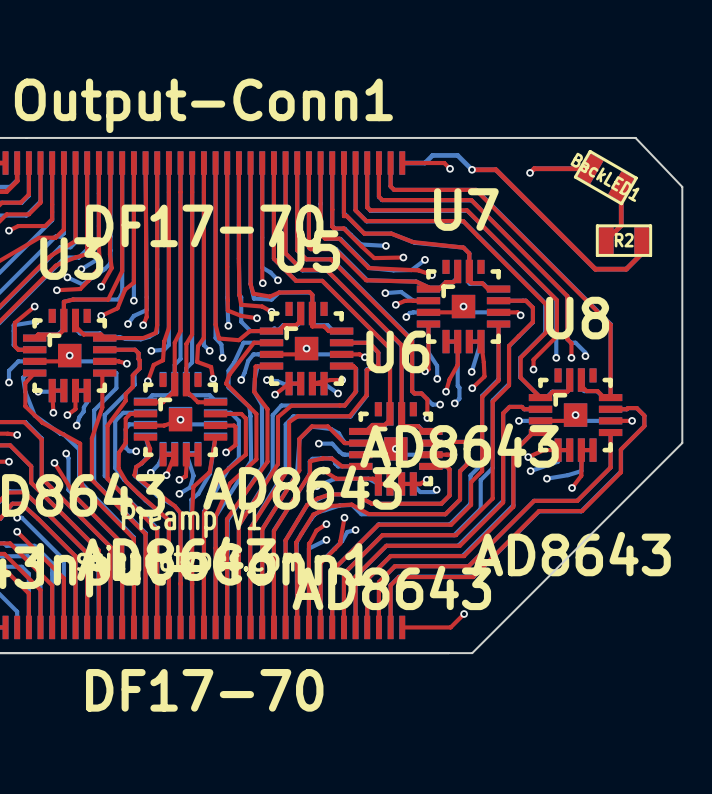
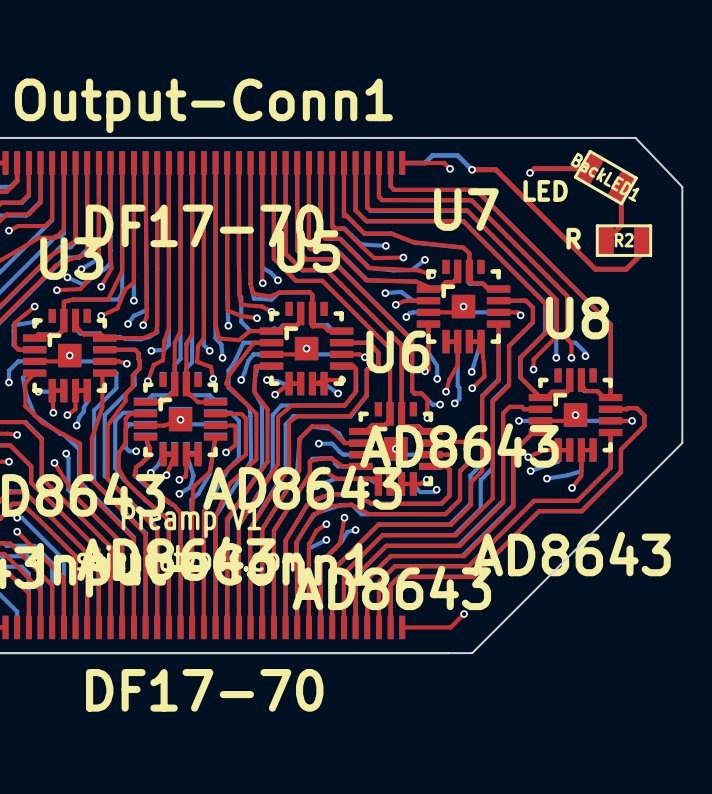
text: none -> LED (545, 190)
text: none -> R (573, 238)

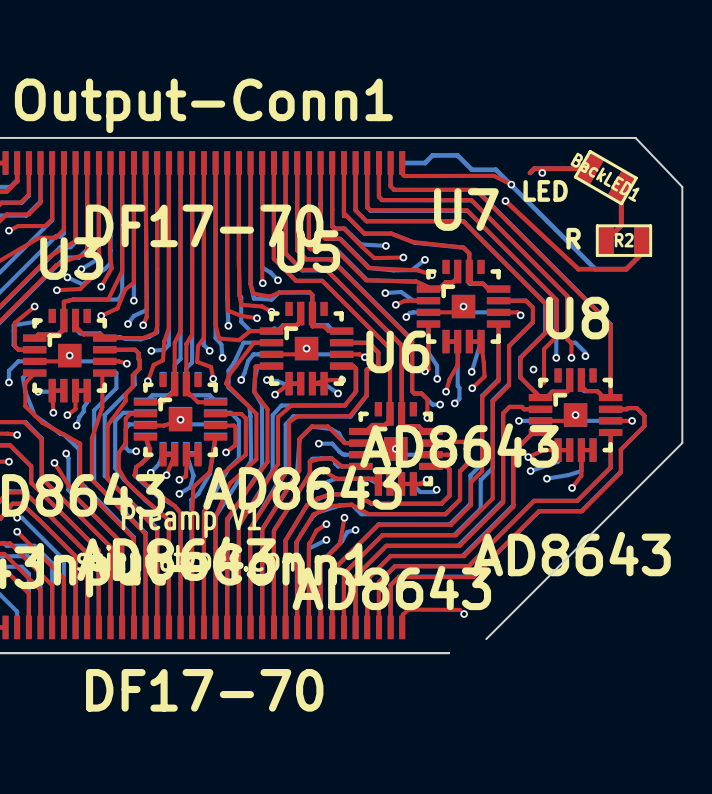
top track: (402, 163) (444, 163) (450, 168) -> (402, 163) (404, 176) (493, 175) (511, 184)
via: (450, 168) -> none
top track: (471, 169) (495, 169) (595, 269) -> (505, 200) (578, 269) (595, 269)
via: (471, 169) -> none
via: (530, 172) -> none
via: none -> (542, 172)
via: none -> (511, 184)
via: none -> (505, 200)
top track: (544, 349) (533, 359) (533, 369) -> (544, 349) (544, 383)
top track: (464, 614) (450, 627) (402, 627) -> (460, 609) (408, 609) (402, 614) (402, 627)
board edge: (486, 639) (472, 653) (448, 653) -> none

